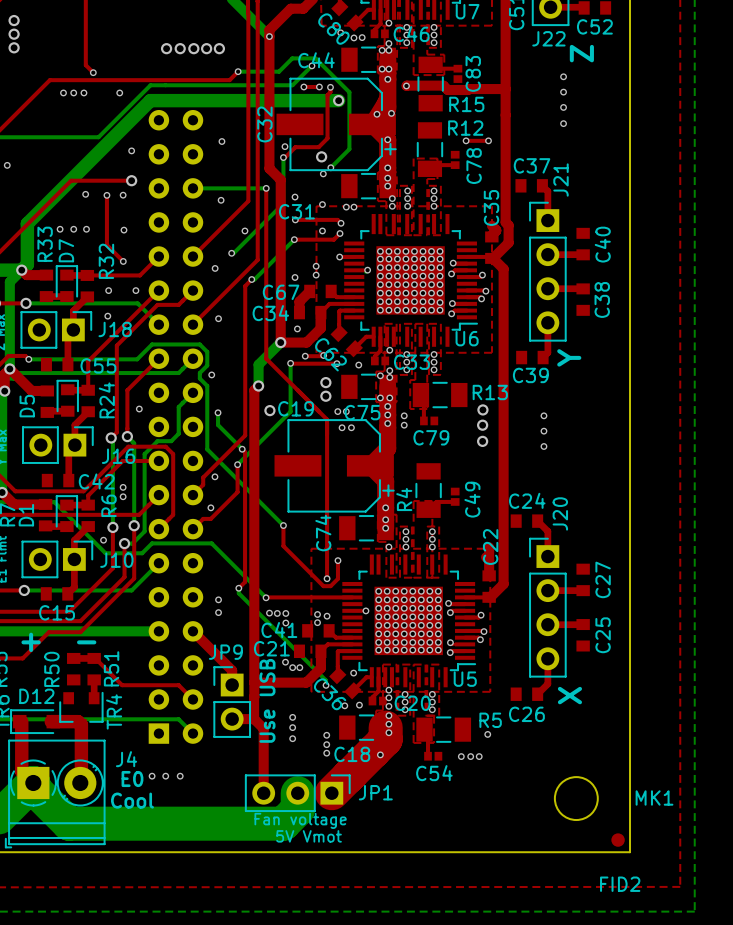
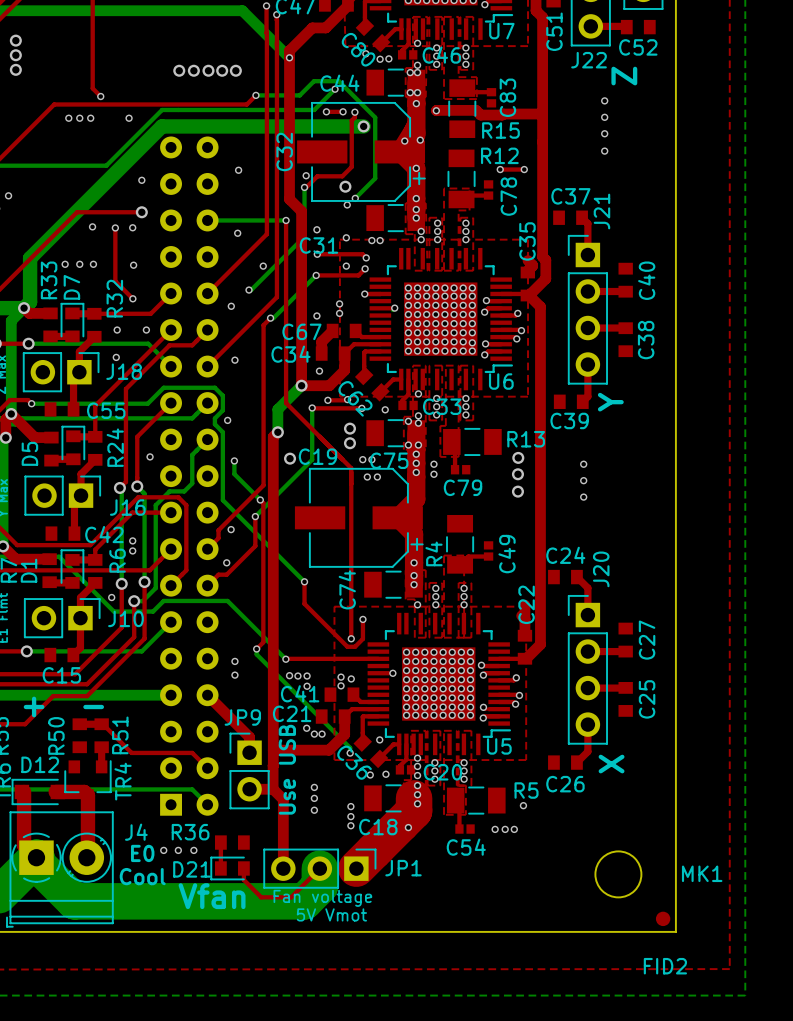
top track: none -> (220, 842) (220, 868)
R36: none -> (232, 842)
D21: none -> (230, 868)
top track: none -> (243, 868) (243, 879) (261, 897) (291, 897) (319, 868)
text: none -> Vfan (212, 896)

